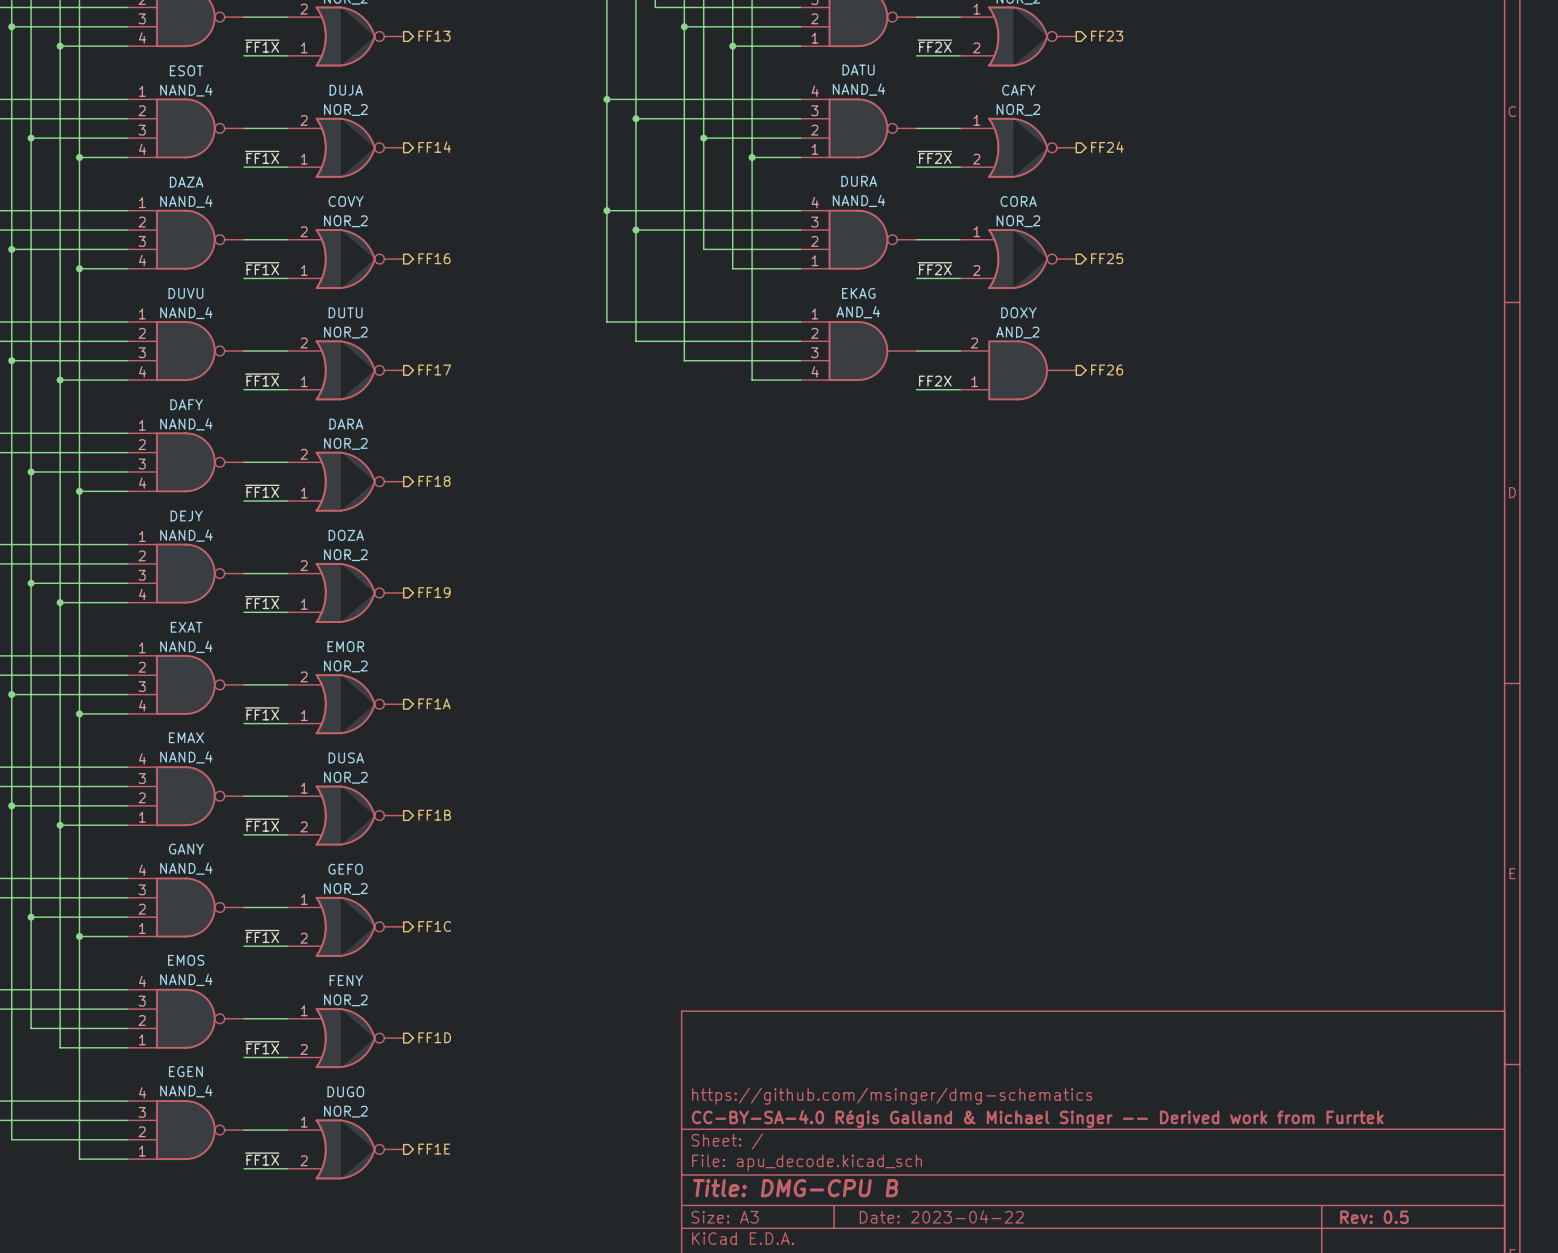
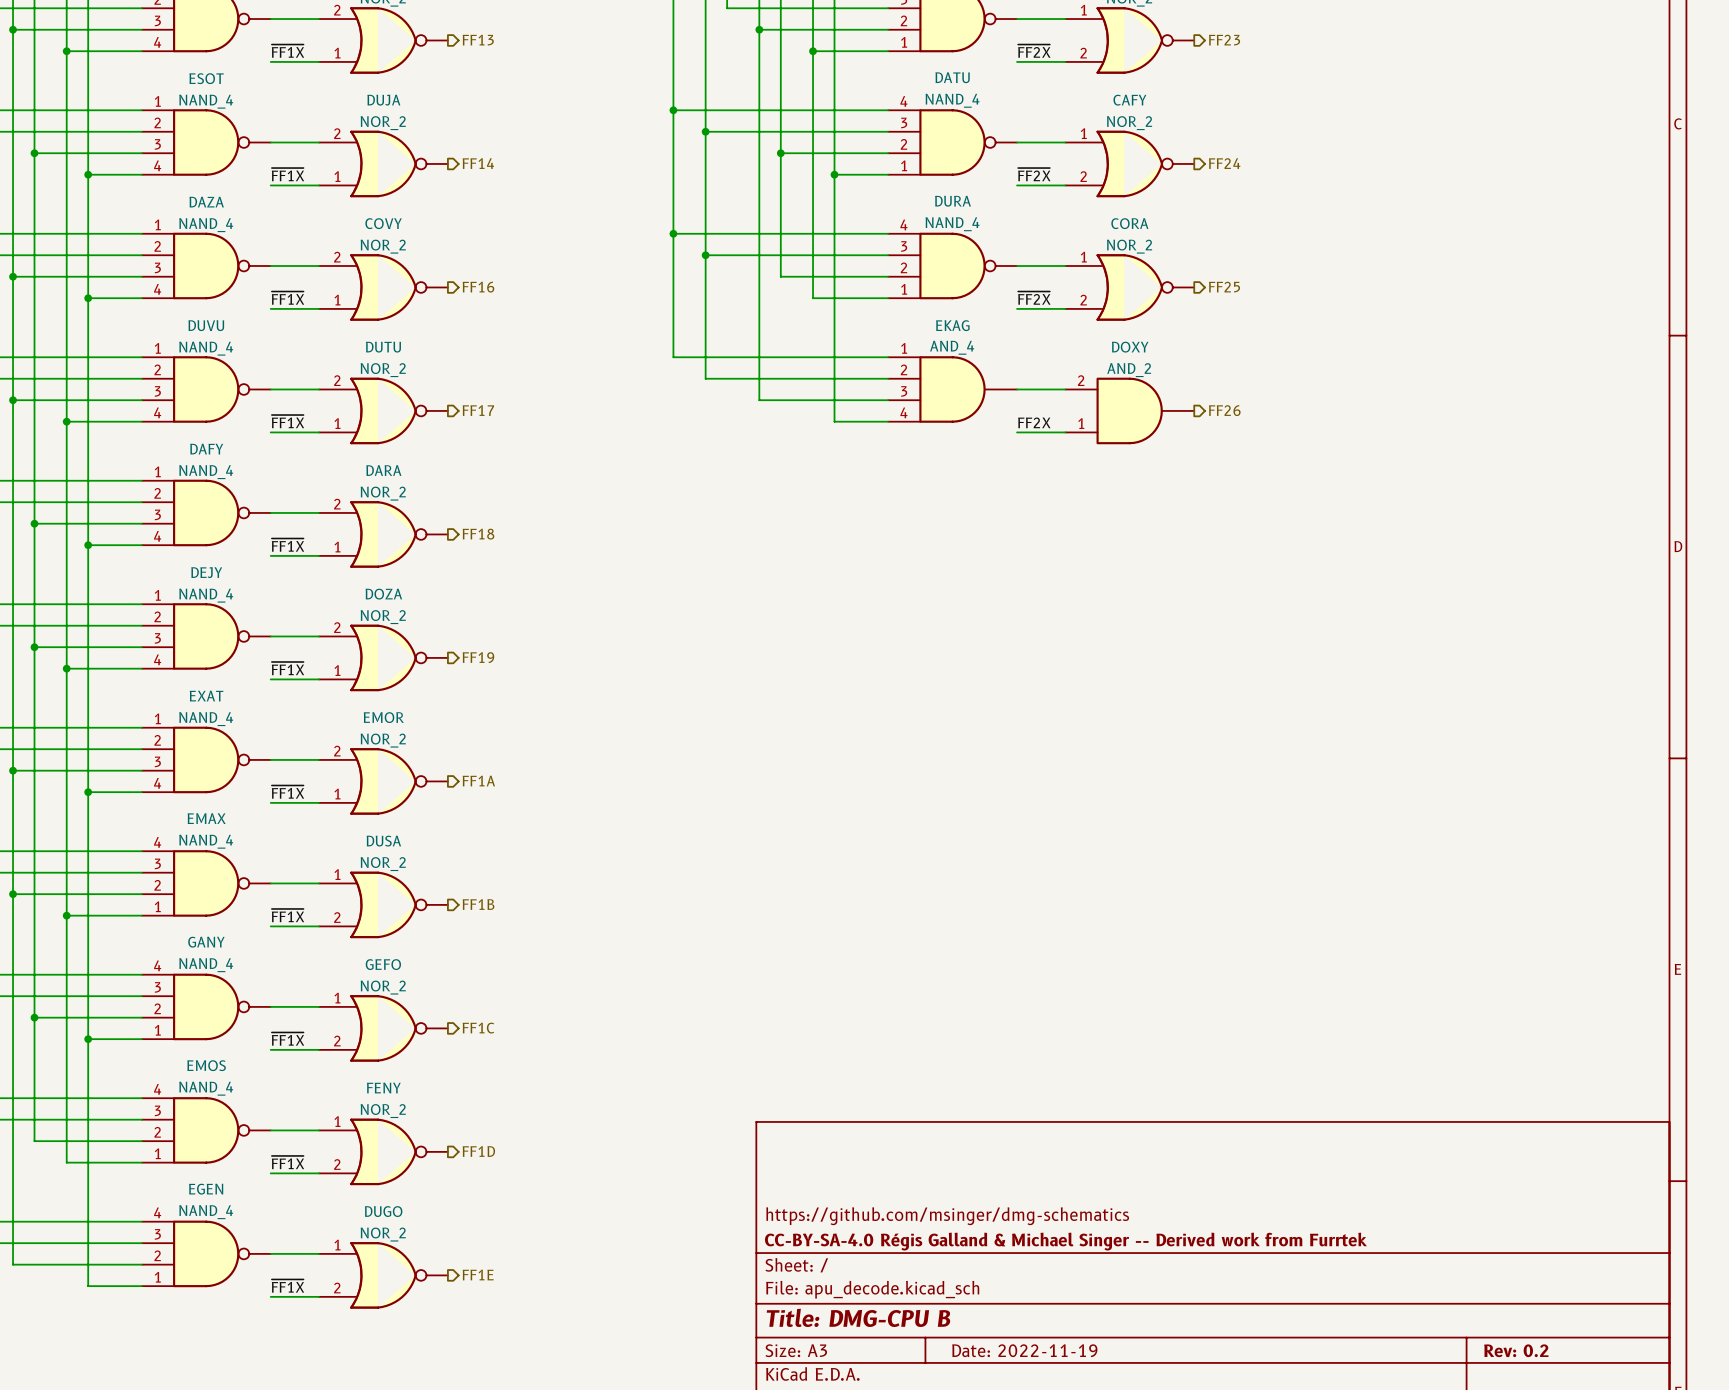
title block: Date: 2023-04-22 (941, 1216) -> Date: 2022-11-19 (1024, 1350)
title block: Rev: 0.5 (1374, 1217) -> Rev: 0.2 (1516, 1350)

